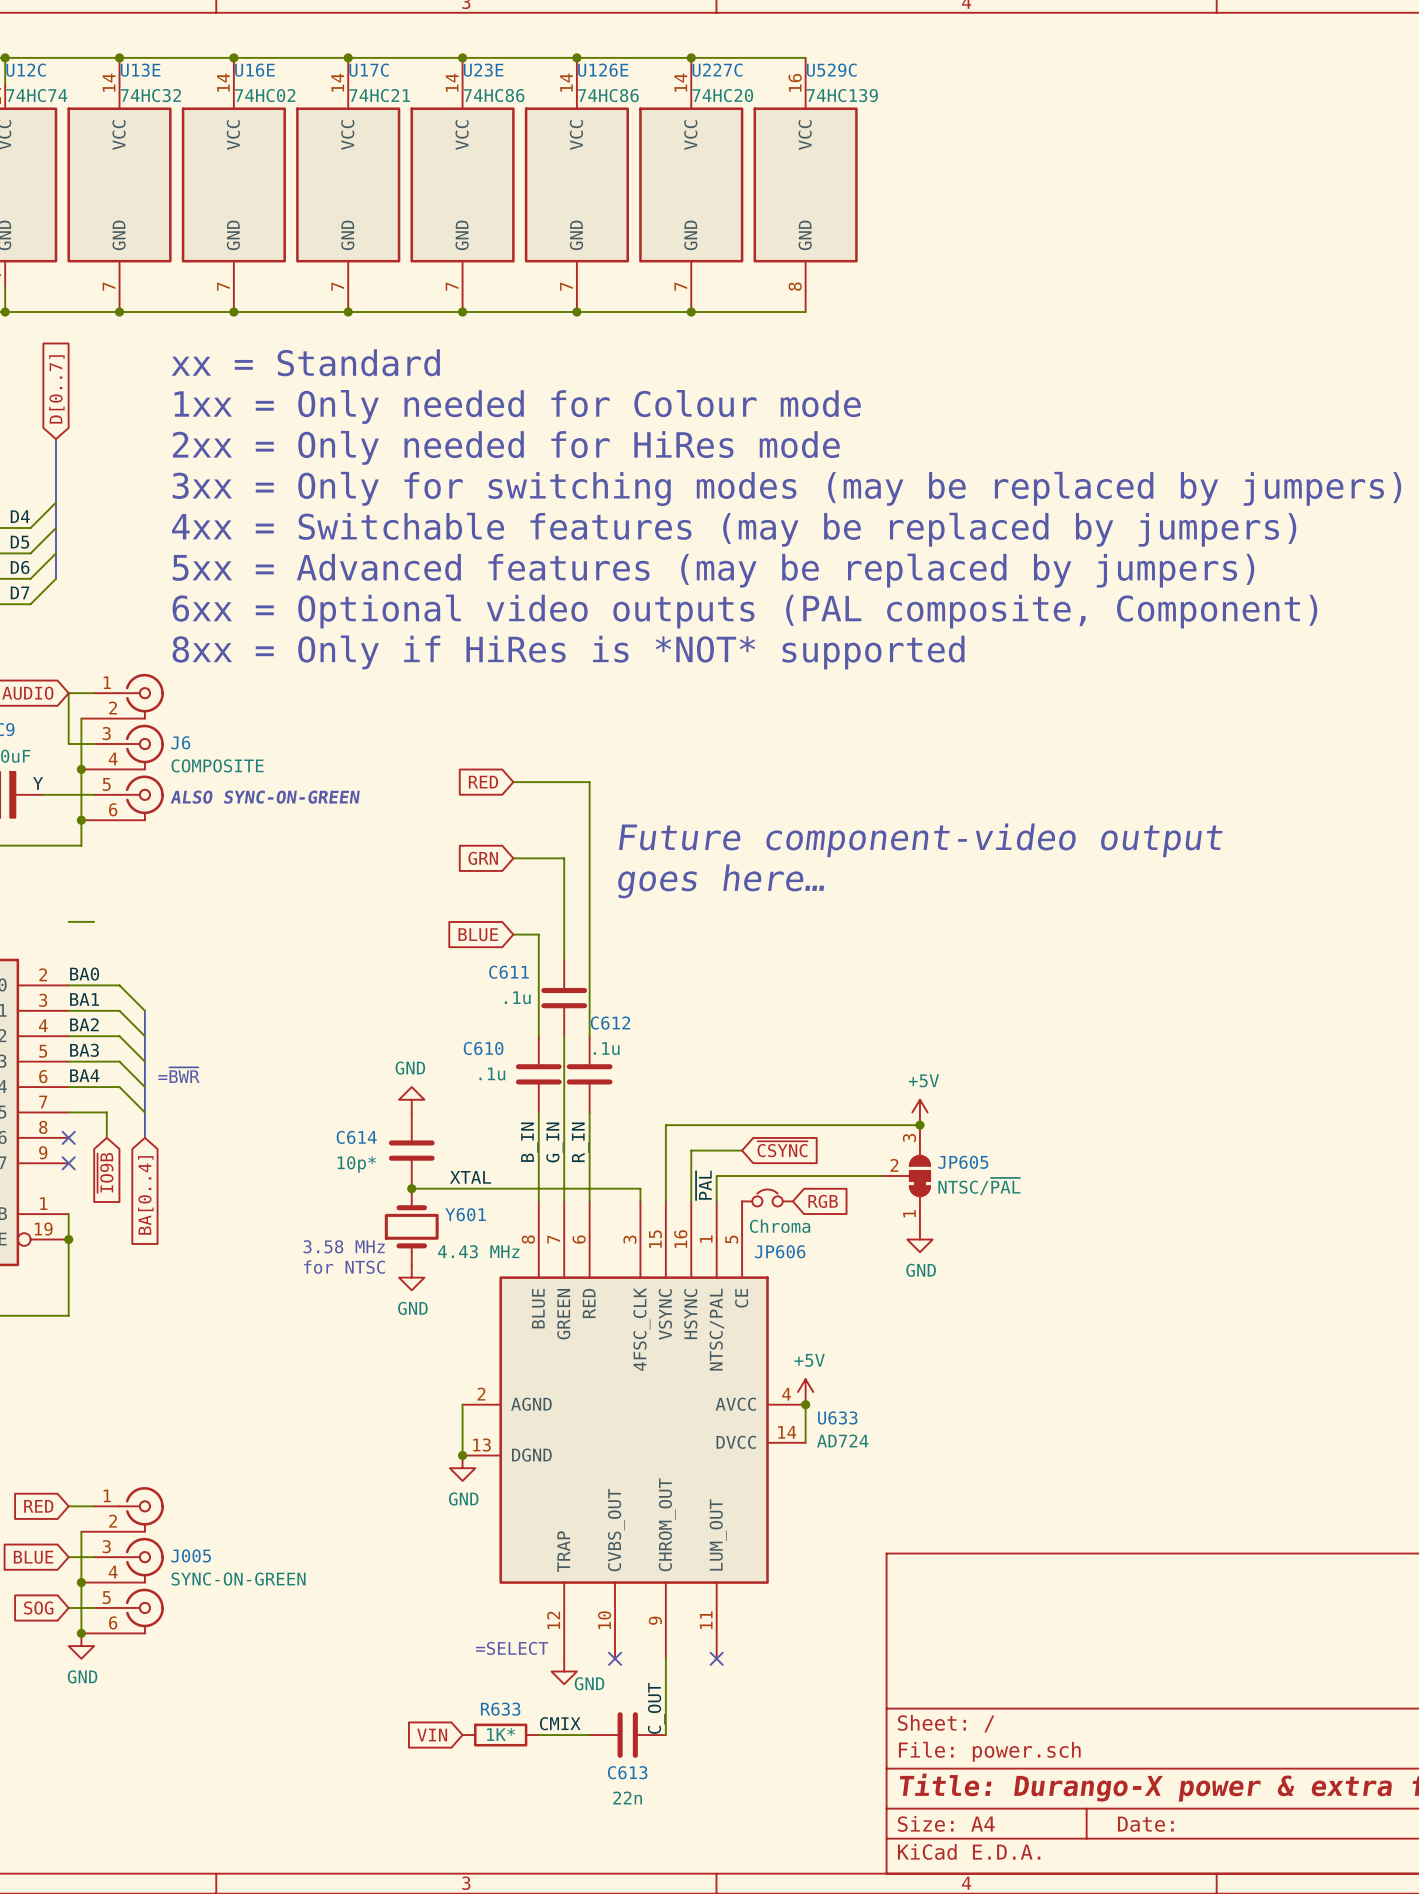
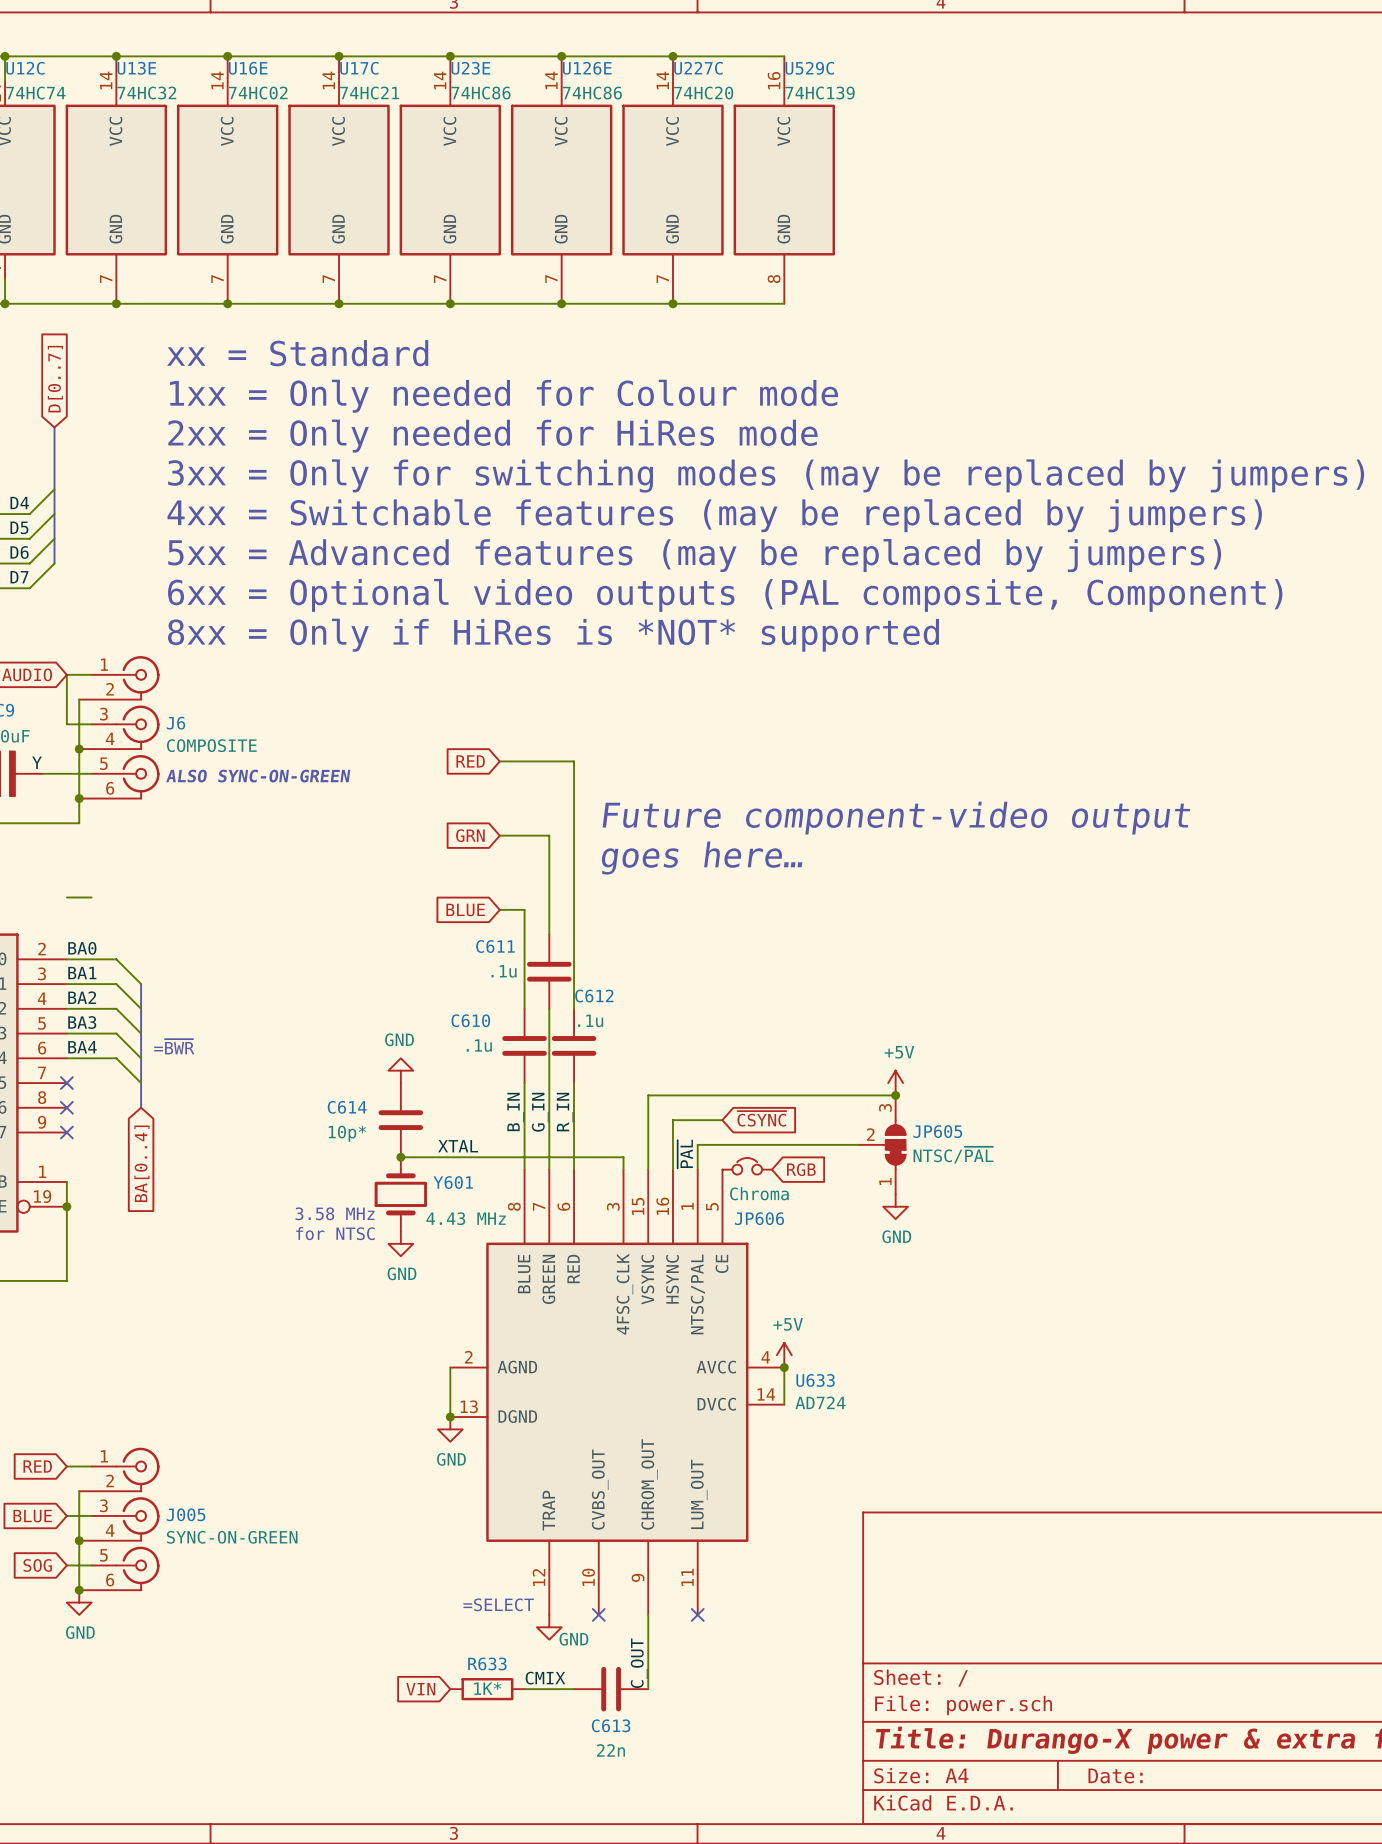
wire: (68, 1112) (106, 1112) (106, 1137) -> none
no-connect mark: none -> (66, 1083)
global label: ~{IO9B} (105, 1172) -> none

